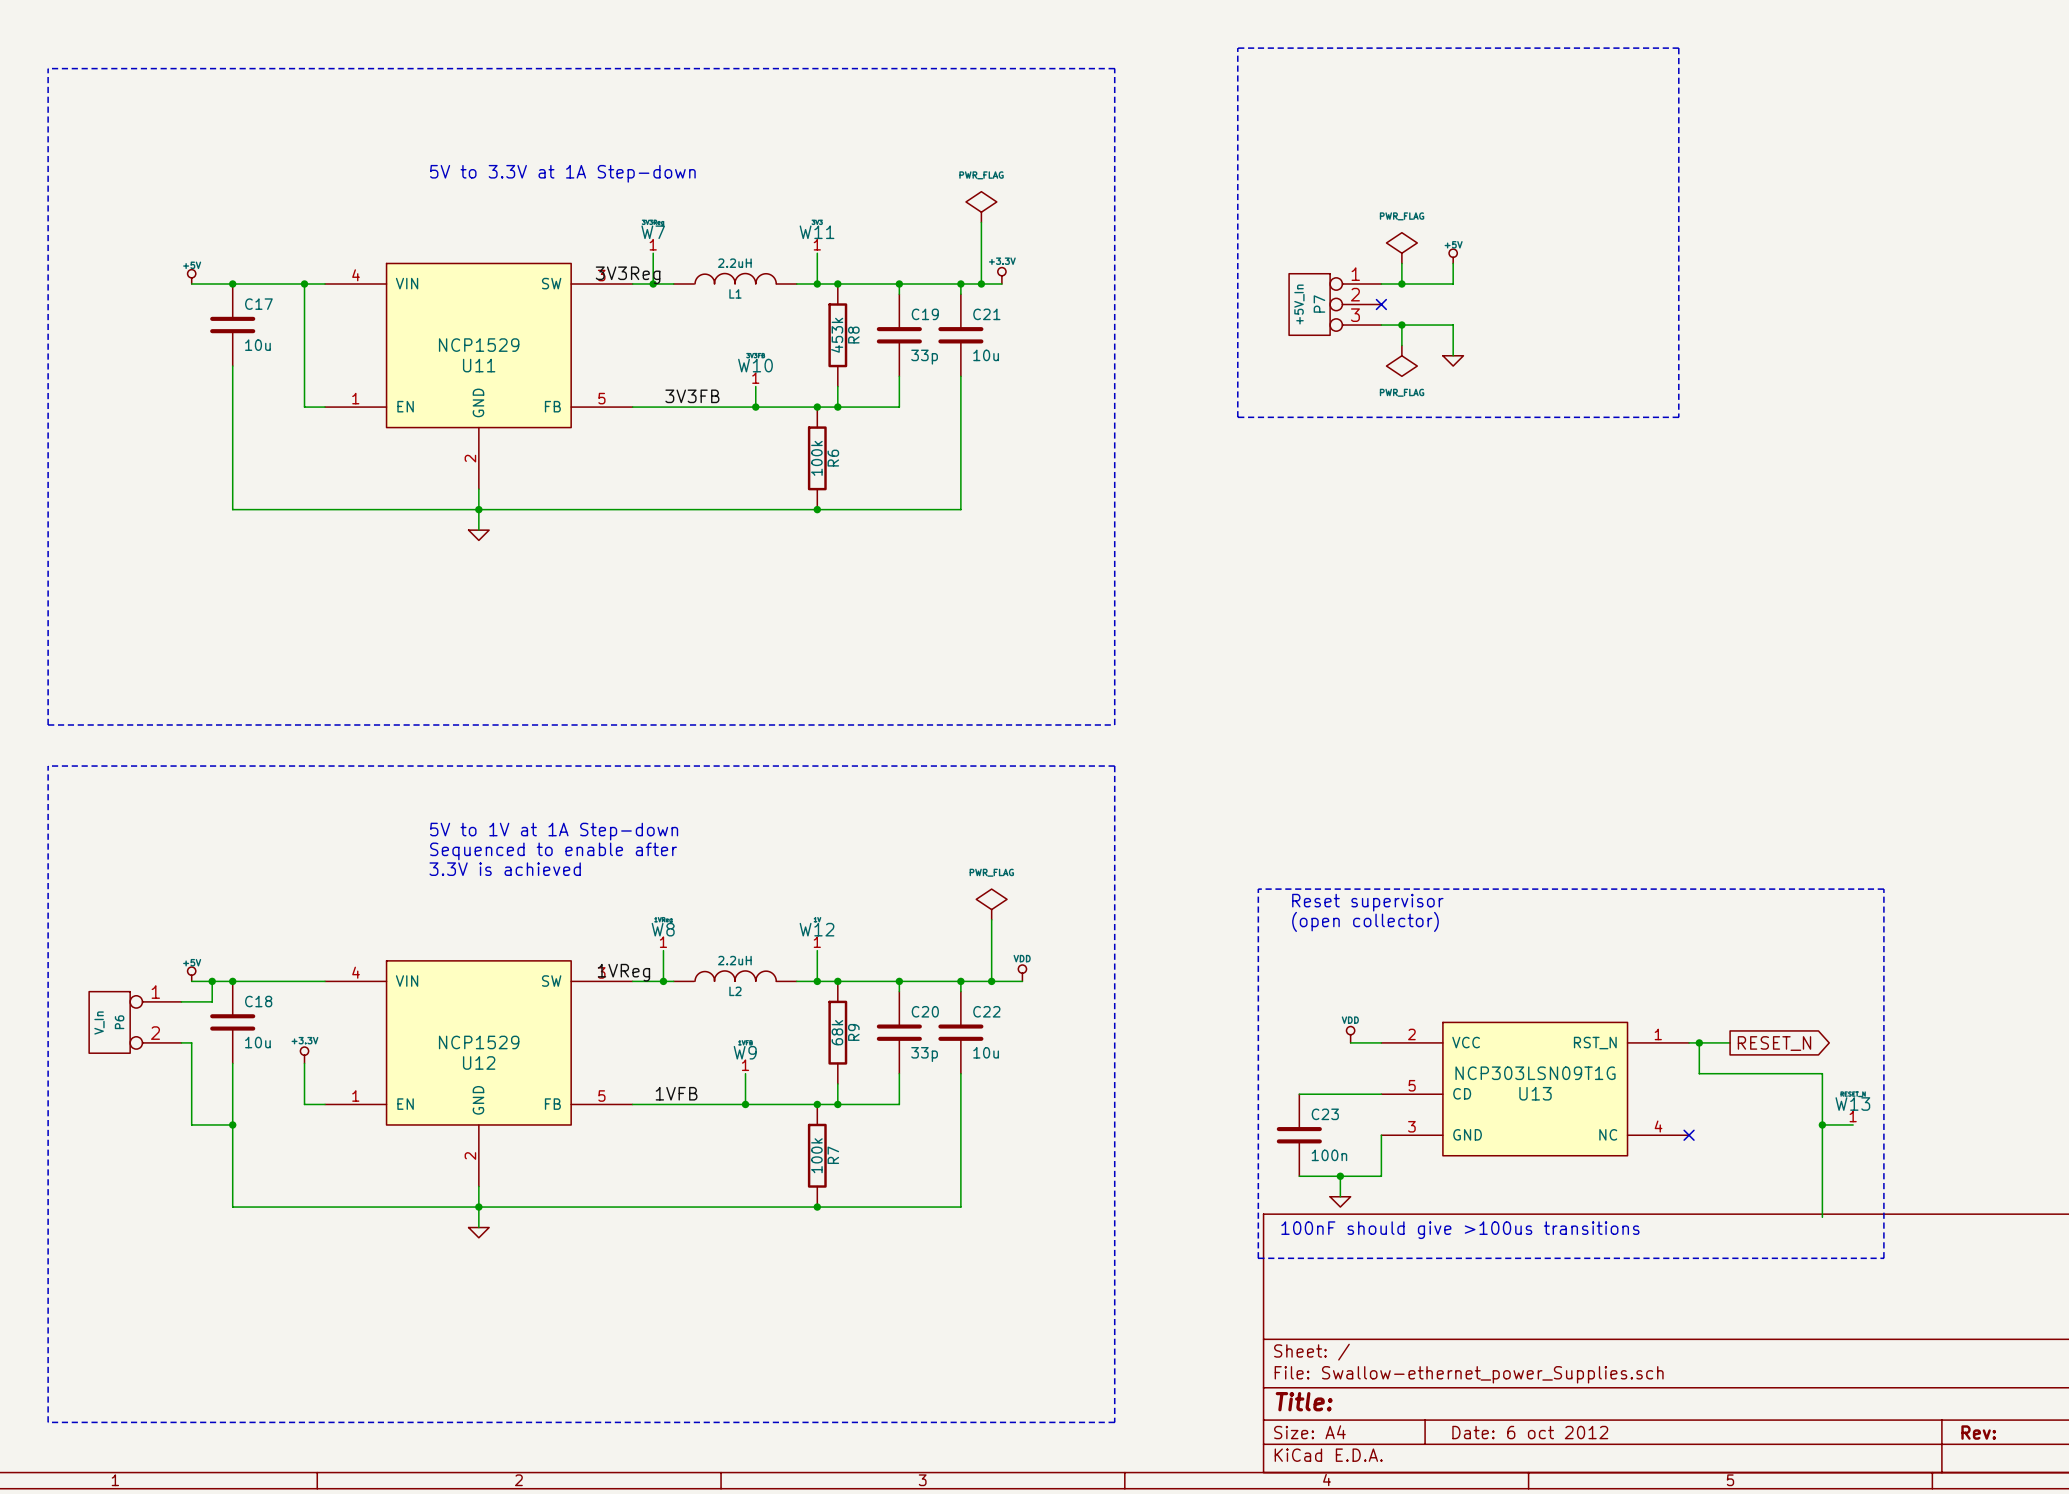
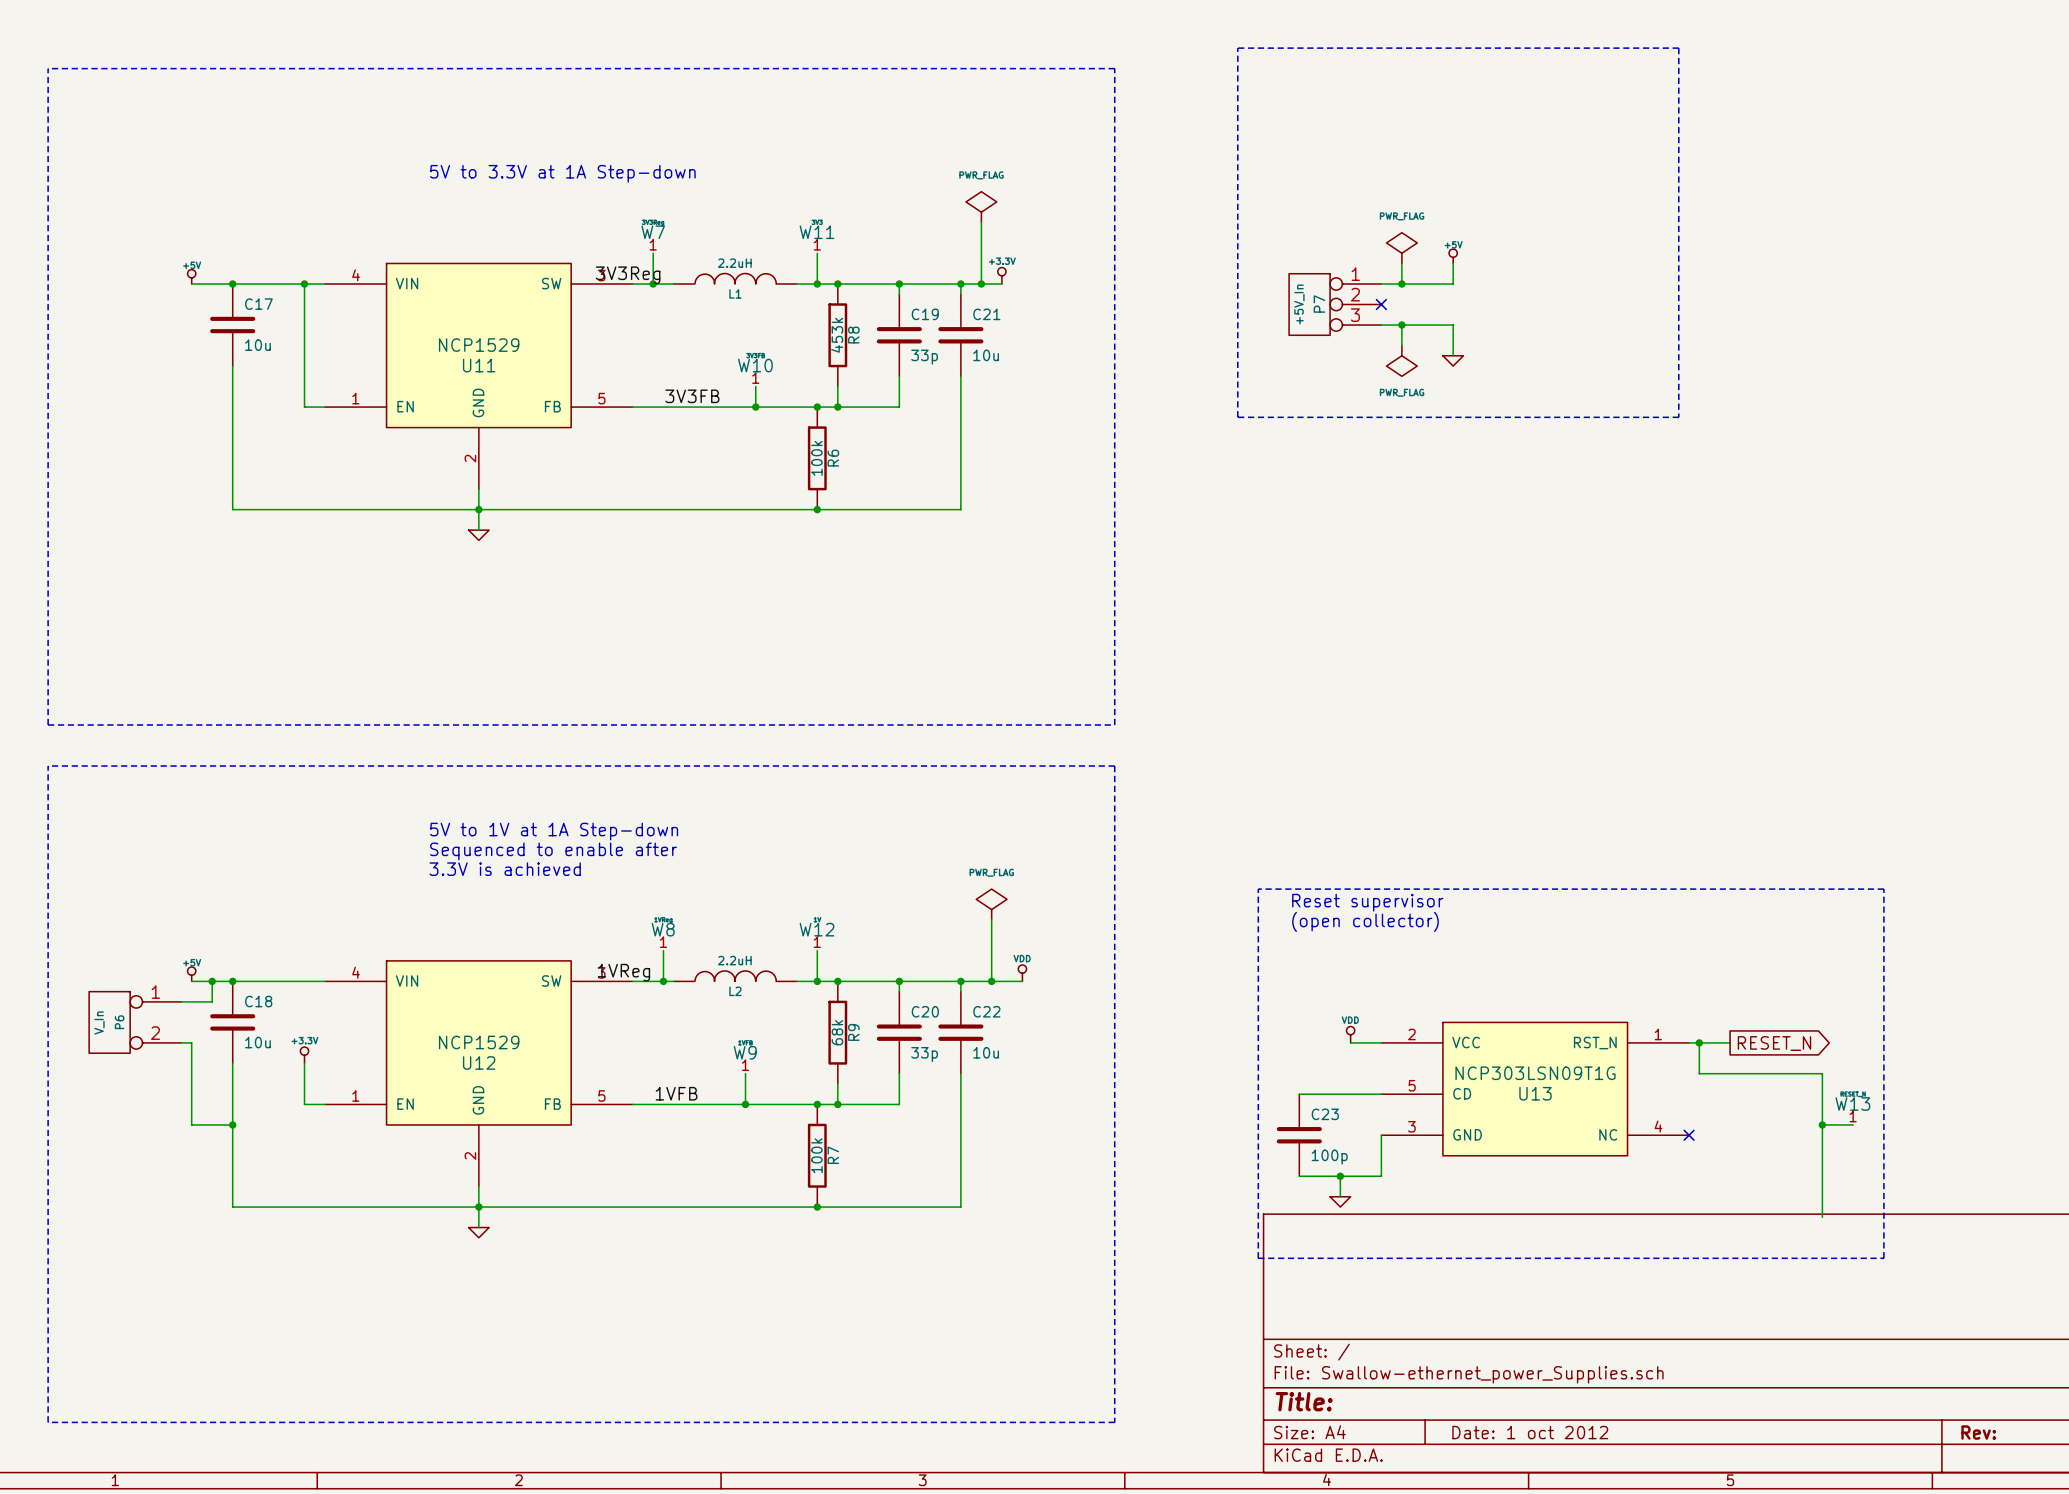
C23 value: 100n (1329, 1155) -> 100p (1329, 1157)
text: 100nF should give >100us transitions (1460, 1230) -> none
title block: Date: 6 oct 2012 (1530, 1432) -> Date: 1 oct 2012 (1530, 1432)

